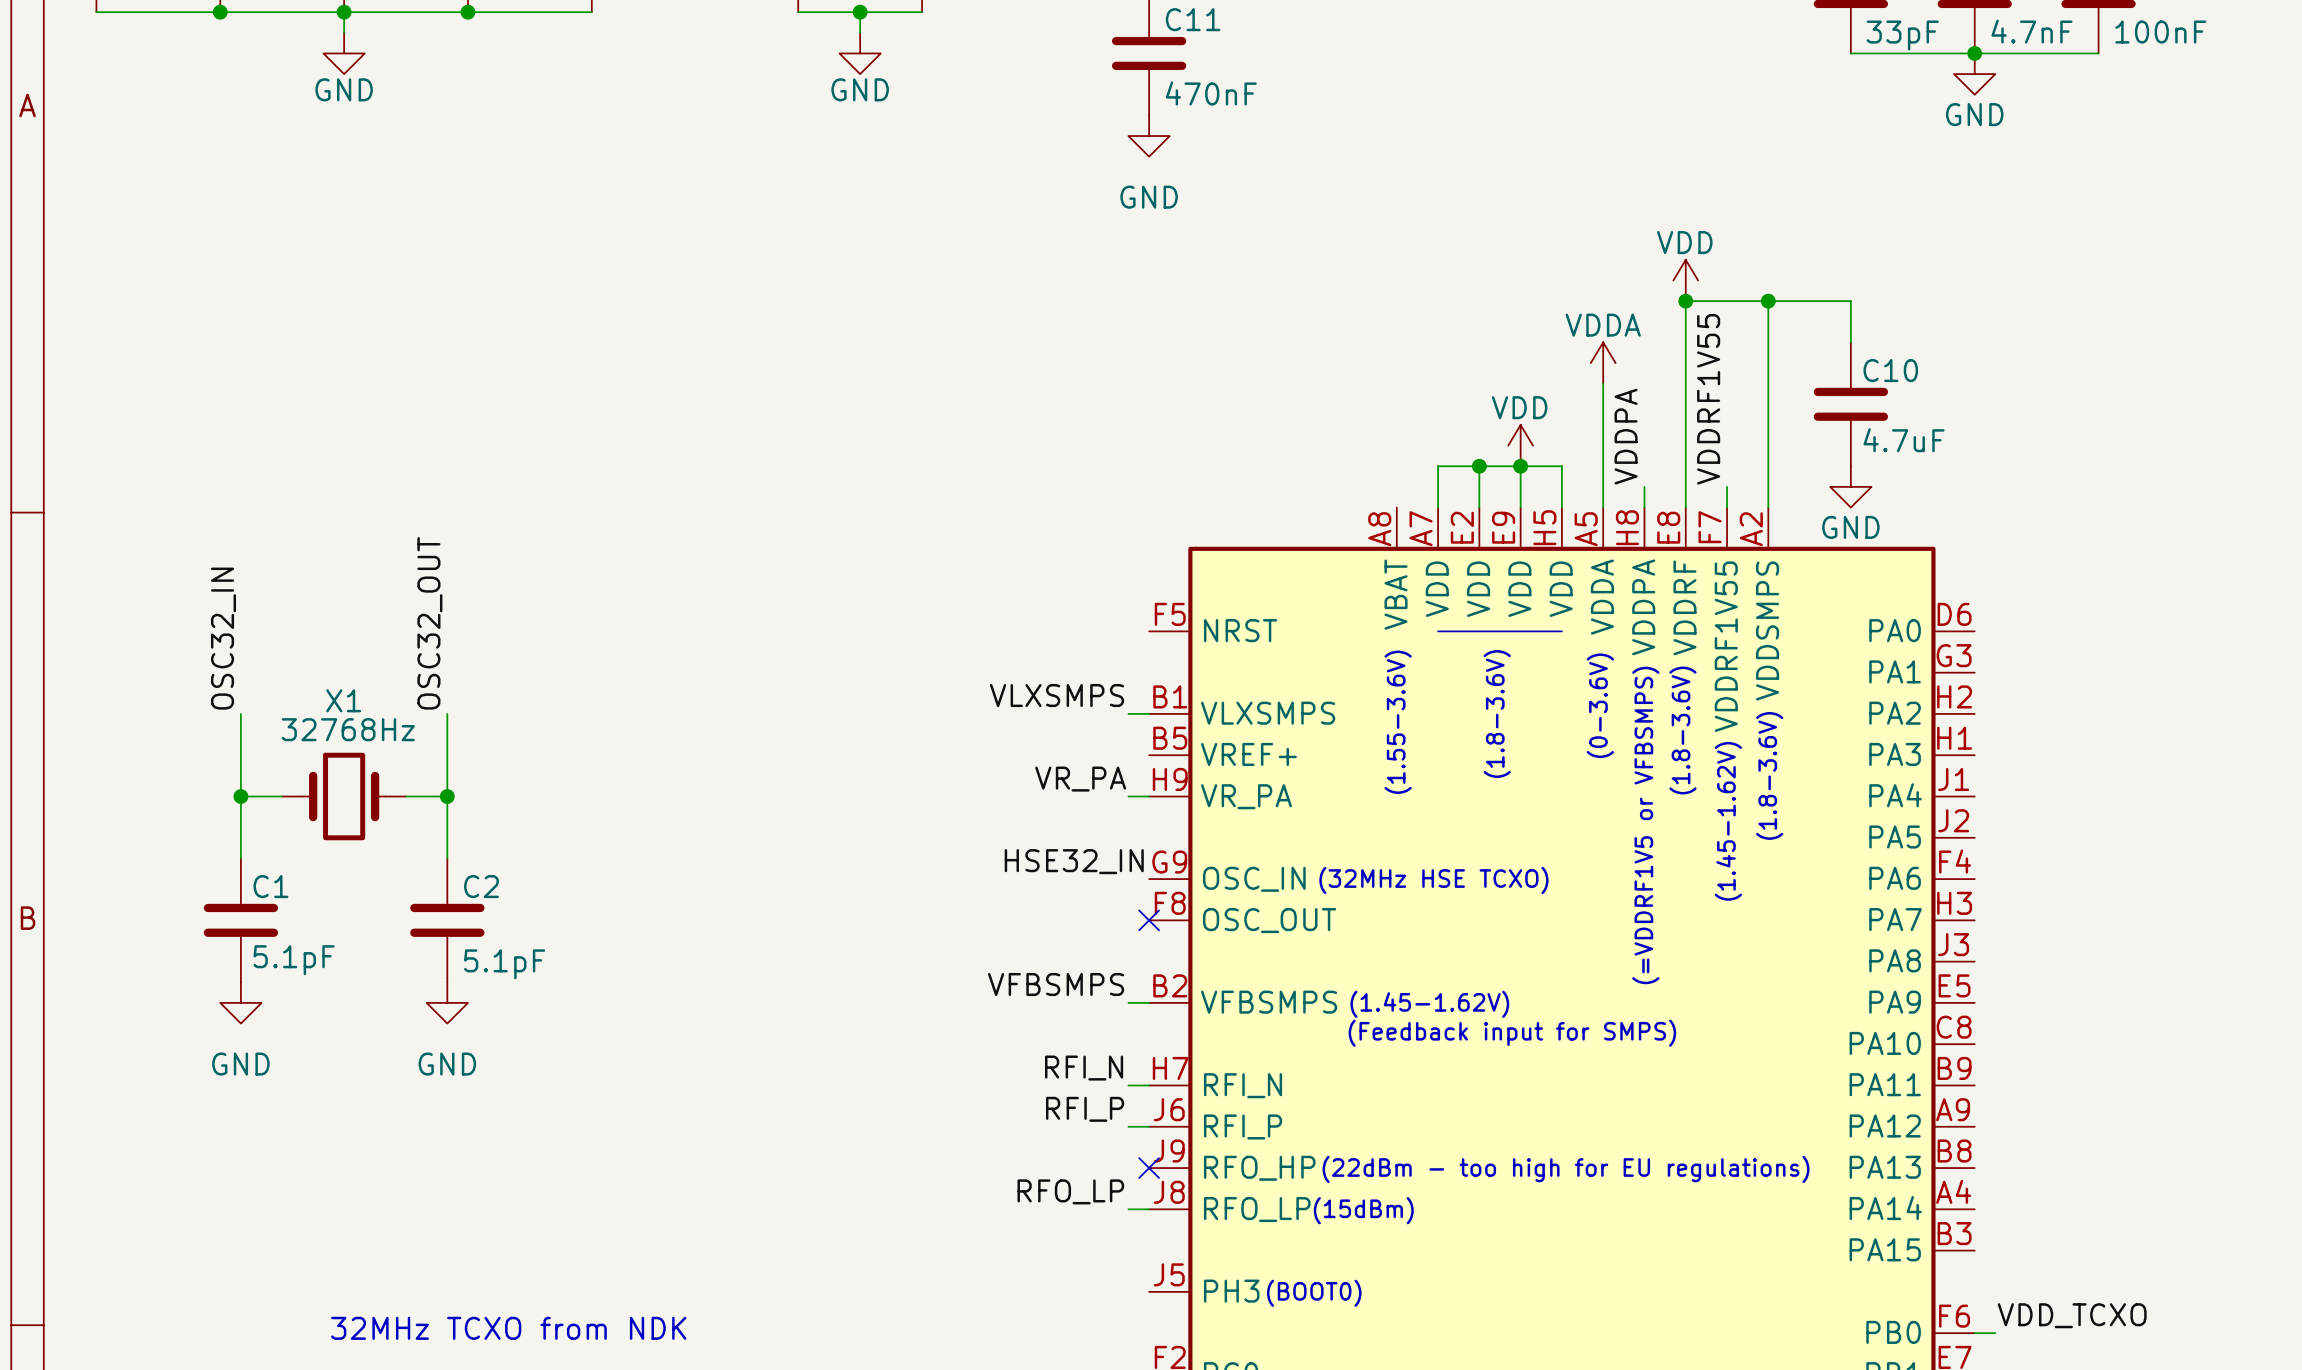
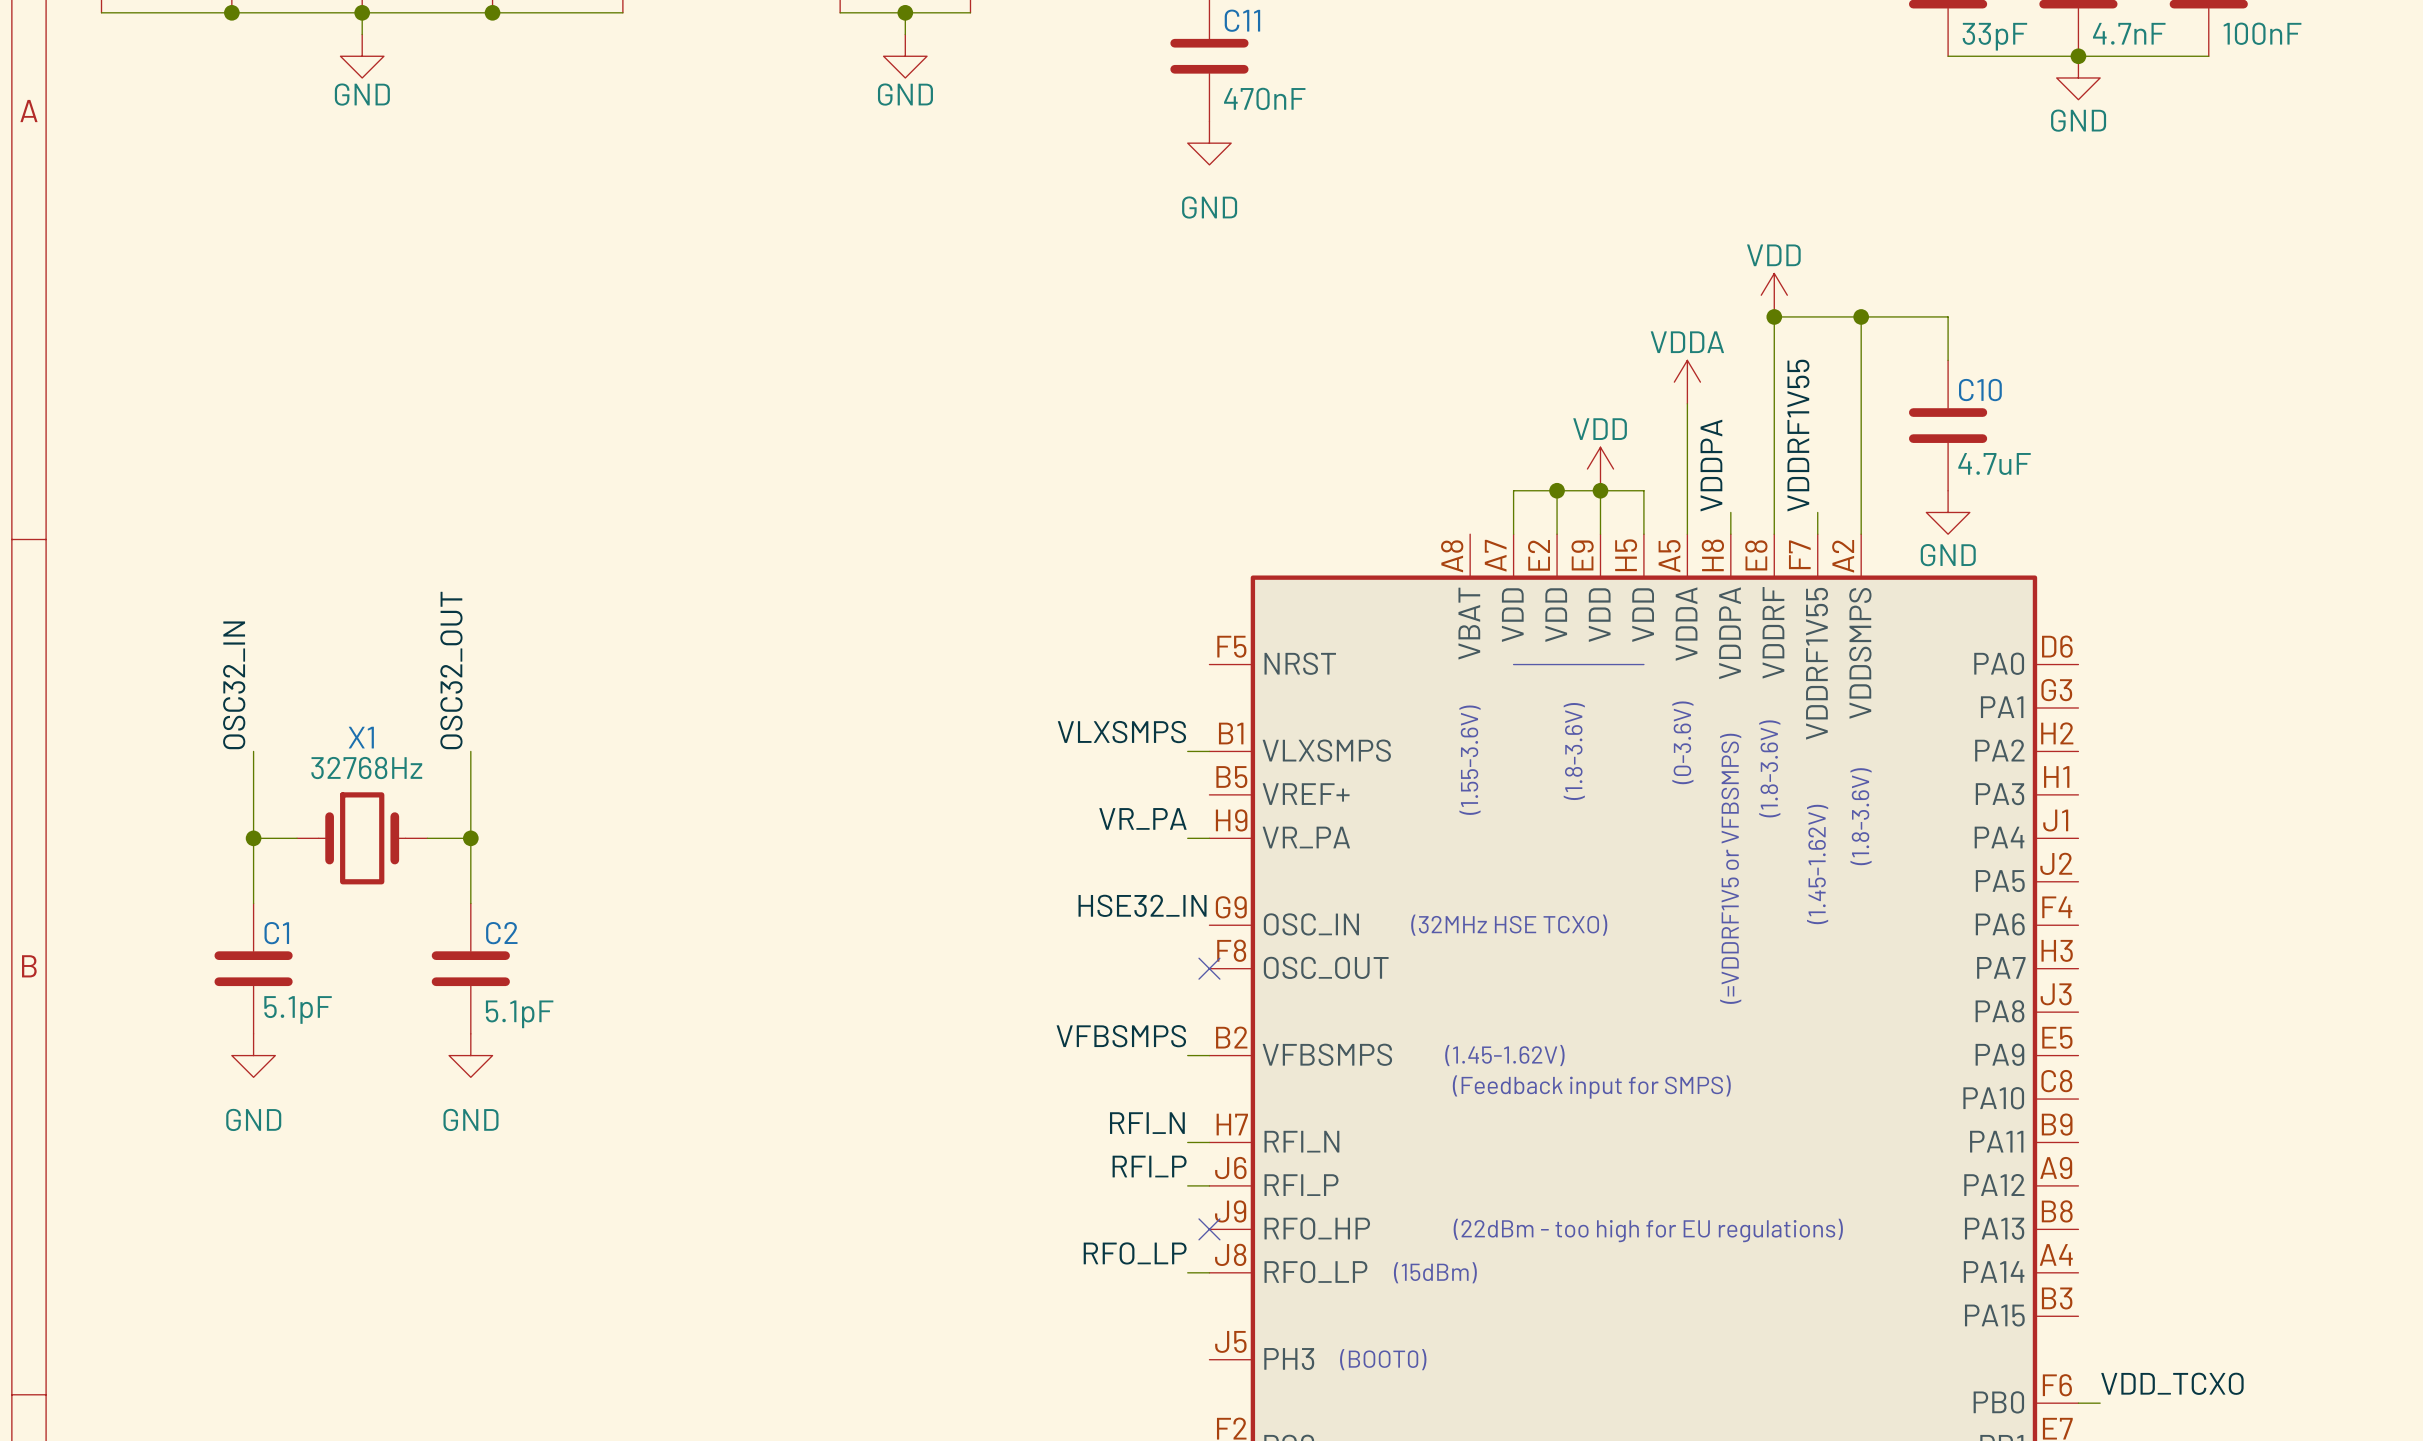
text: 32MHz TCXO from NDK (508, 1328) -> none

